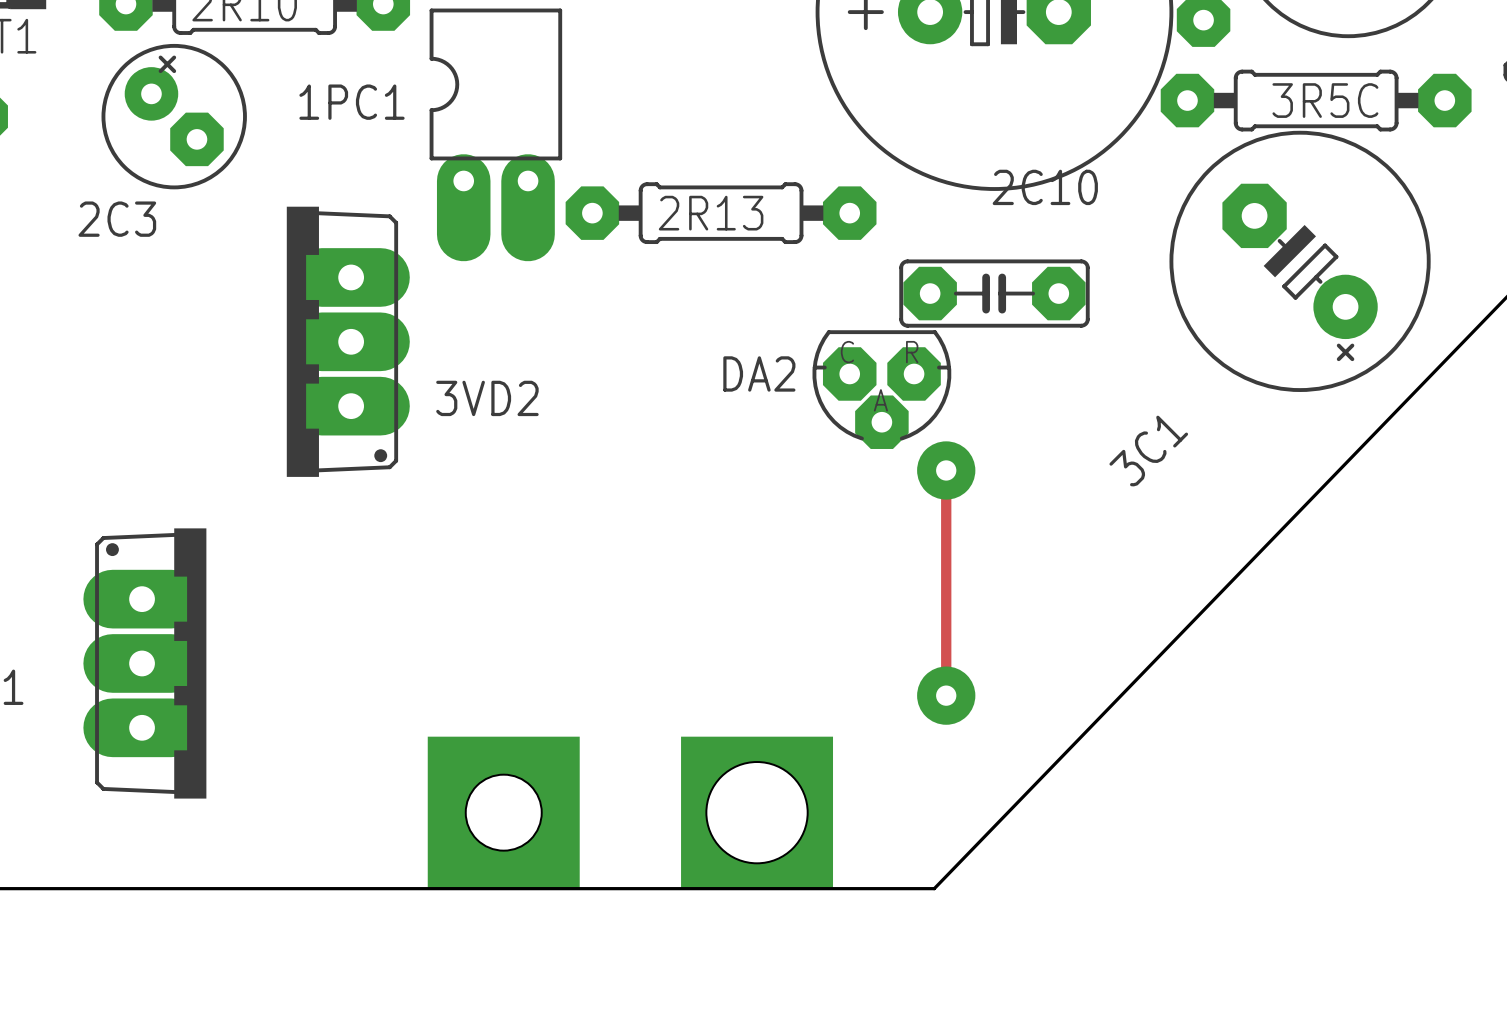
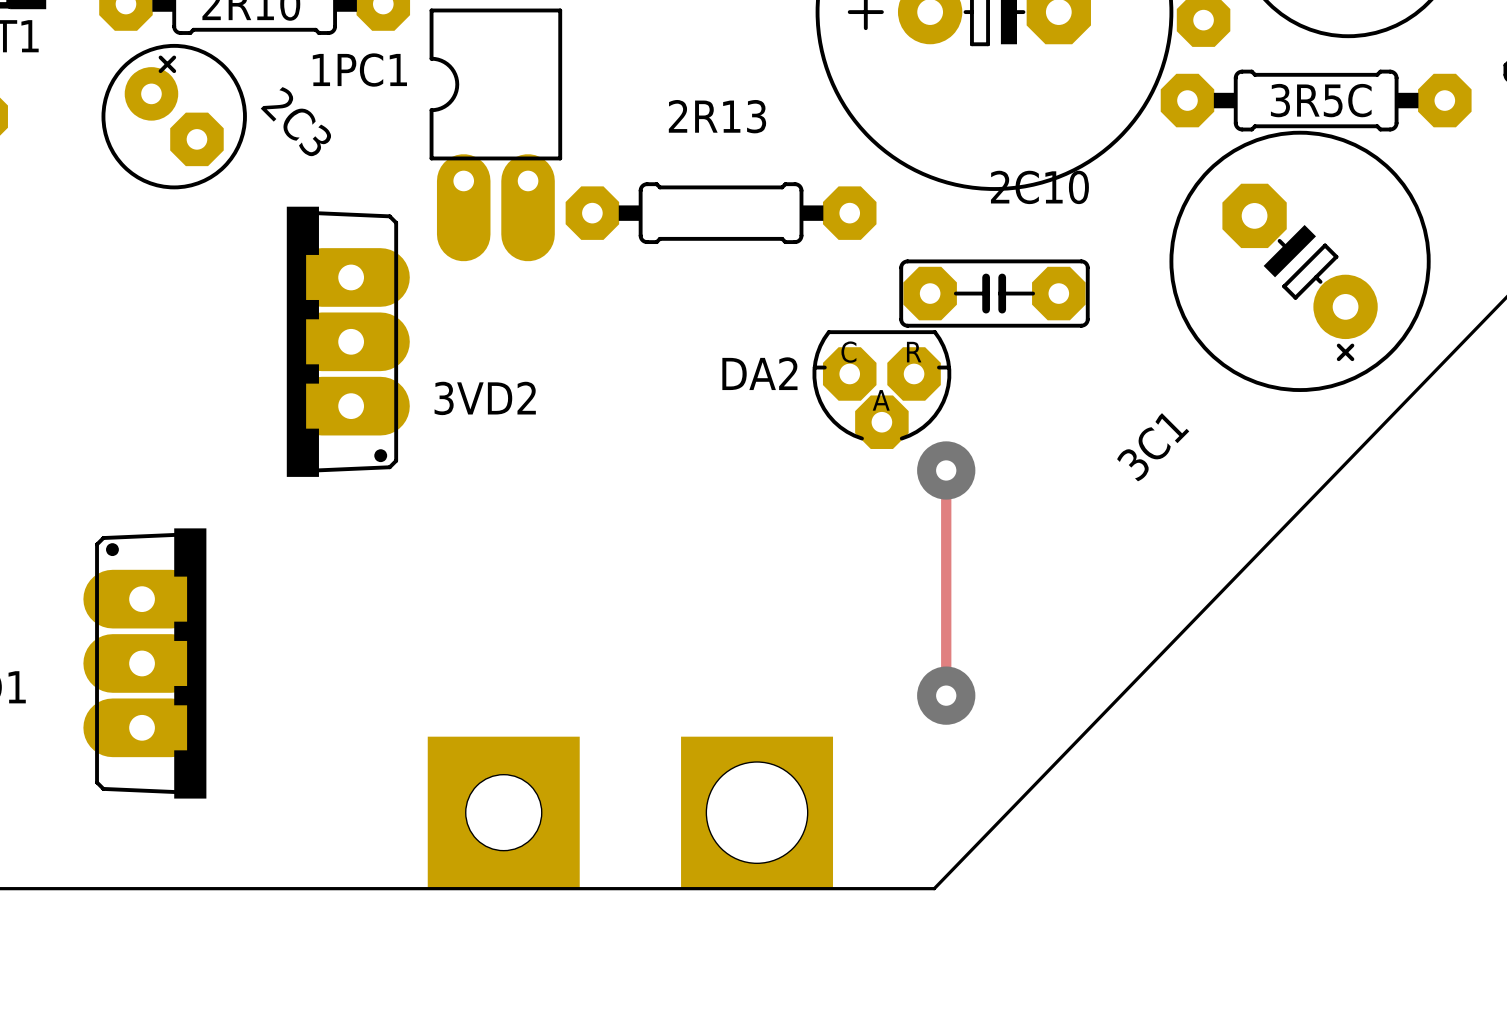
1PC1 name position: 1PC1 (352, 102) -> 1PC1 (359, 70)
2R13 name position: 2R13 (711, 213) -> 2R13 (717, 116)
2C3 name rotation: 0° (117, 219) -> 45° clockwise (296, 121)
2C3 name position: 2C3 (117, 219) -> 2C3 (296, 121)

